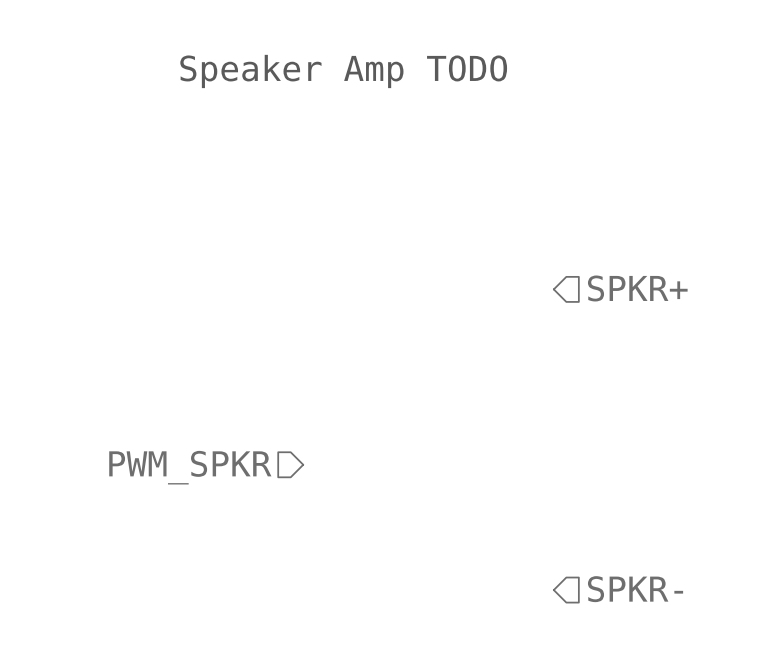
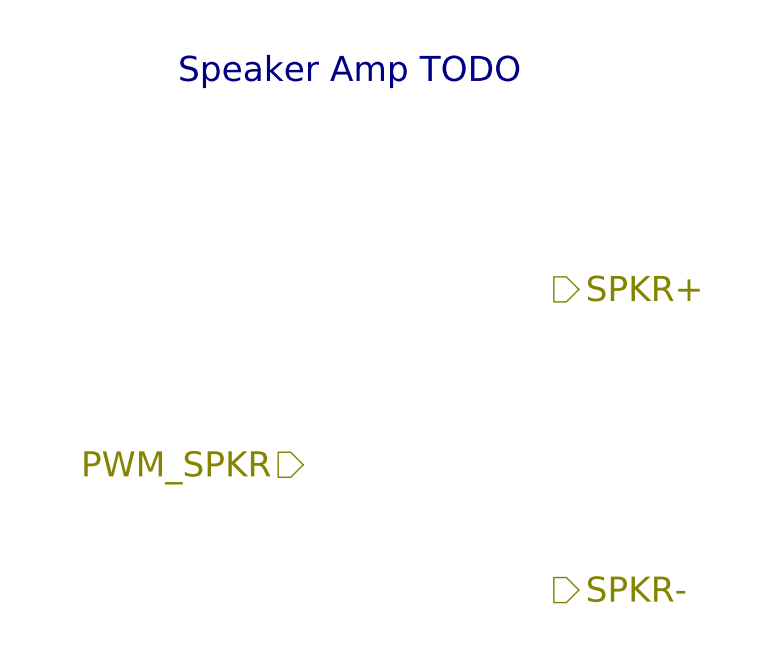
hierarchical label shape: input (637, 288) -> output (643, 288)
hierarchical label shape: input (635, 589) -> output (636, 589)

